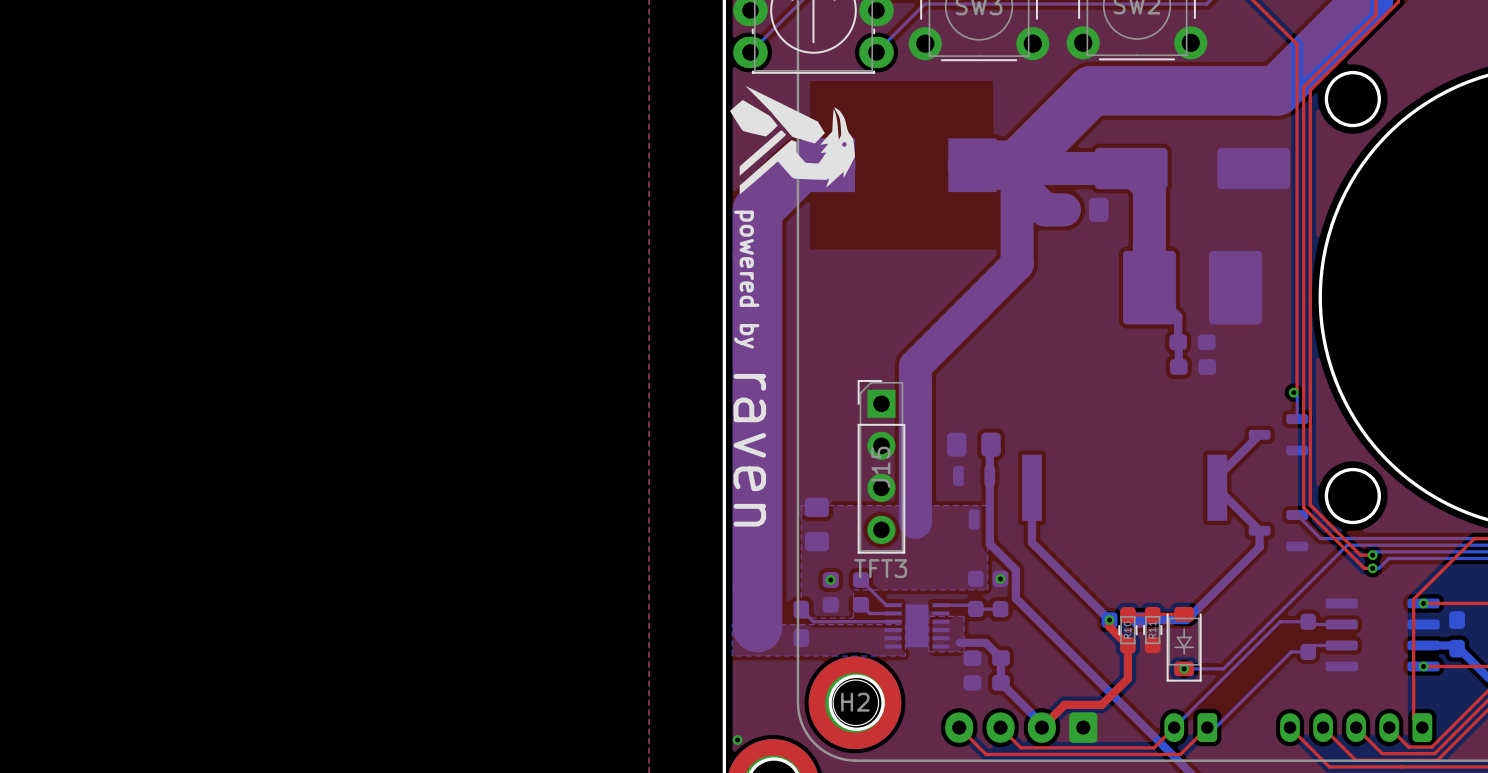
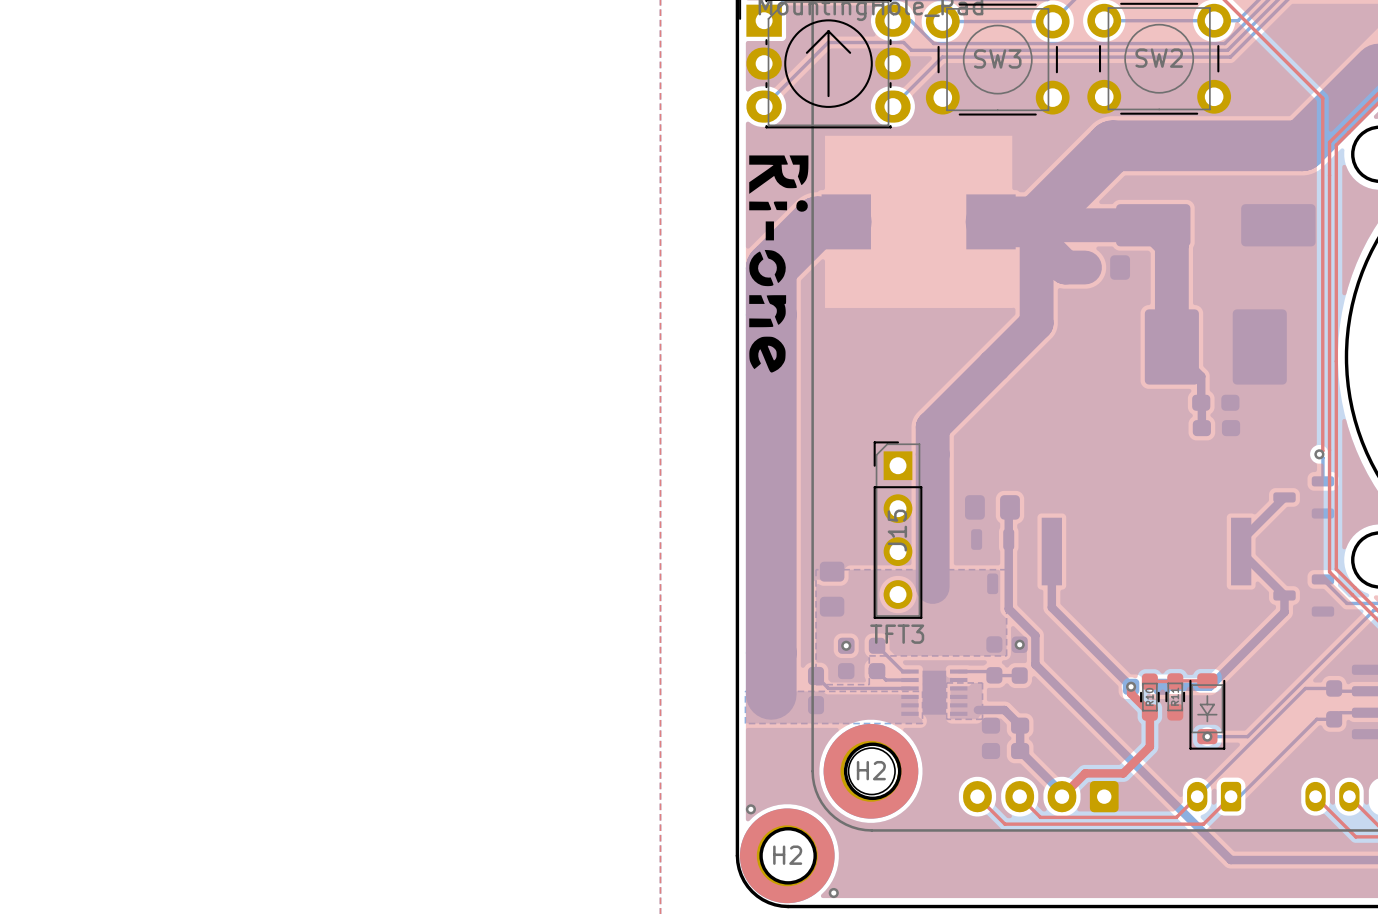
drawing: [730, 85, 856, 195] -> none
drawing: none -> [749, 155, 809, 373]
text: powered by (746, 279) -> none
text: raven (749, 450) -> none

